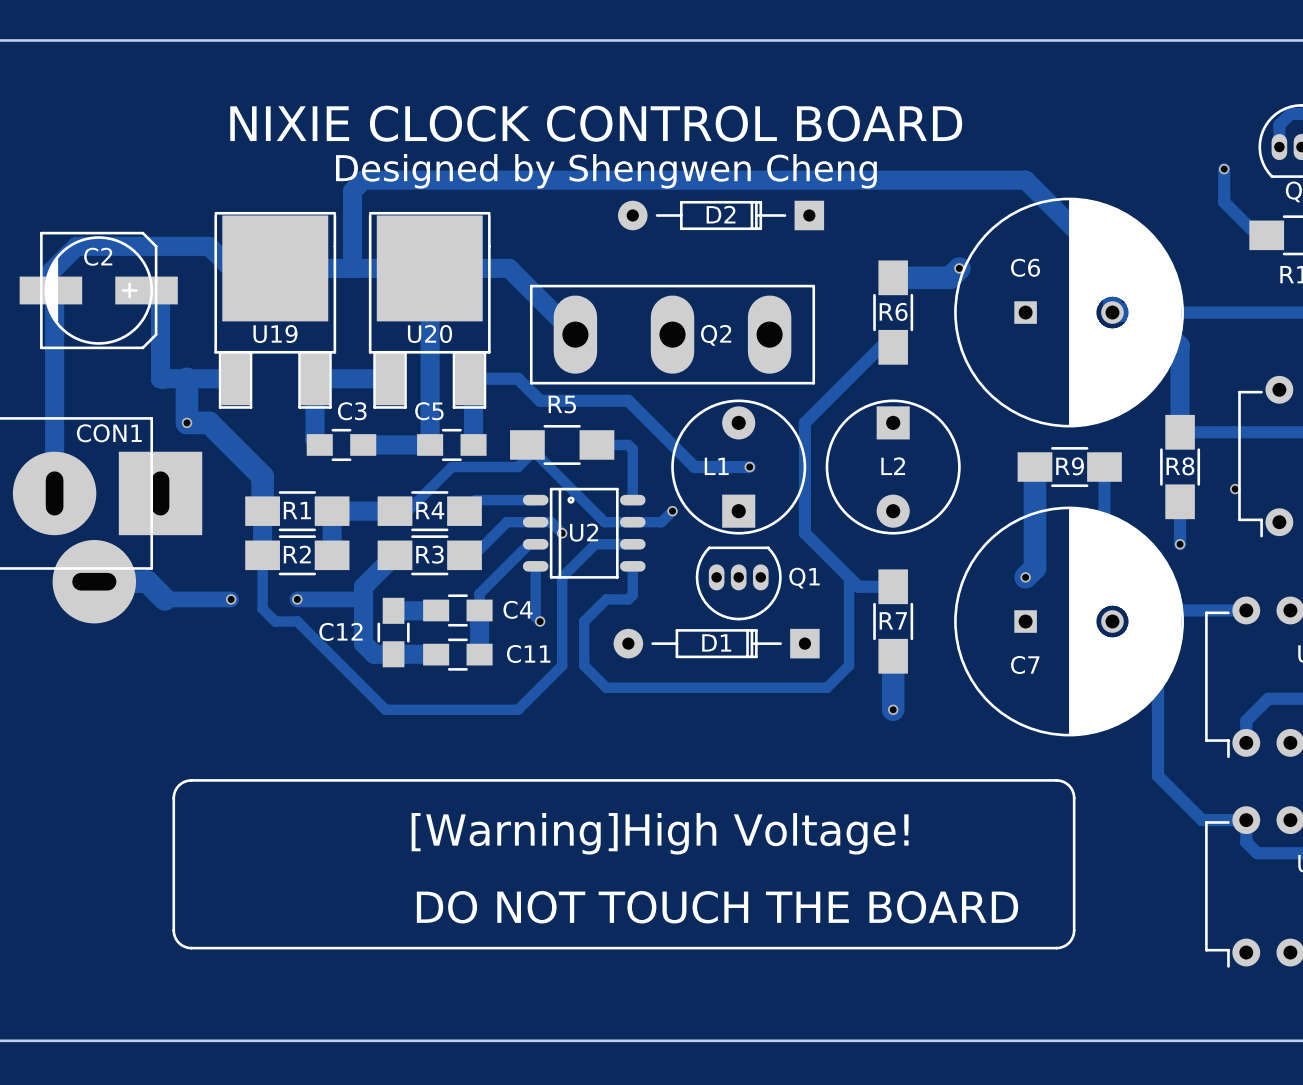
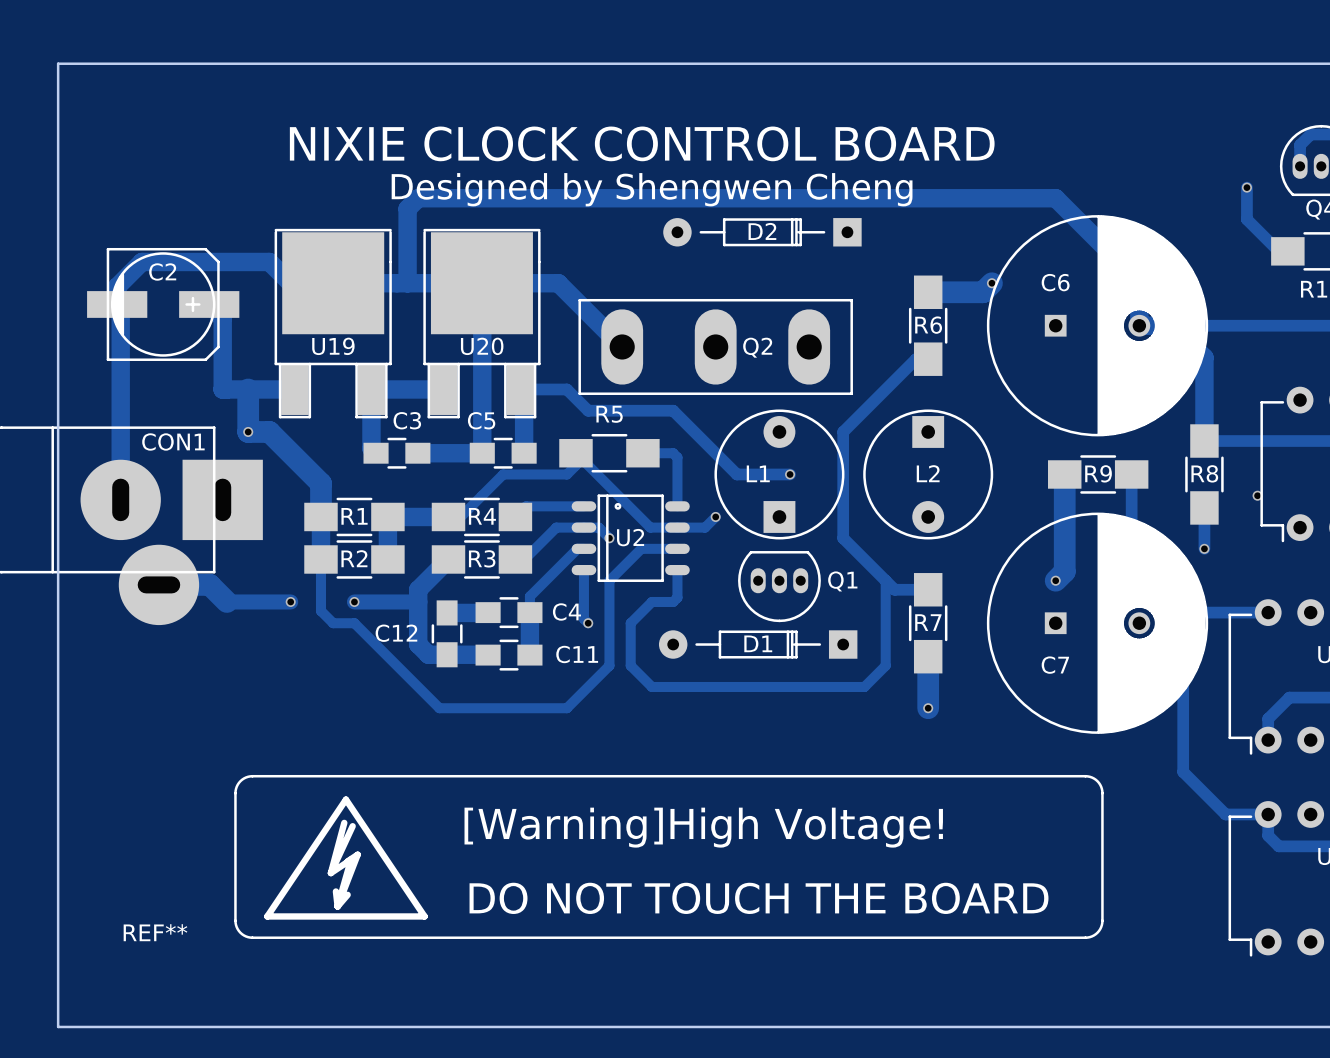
REF**: none -> (345, 858)

